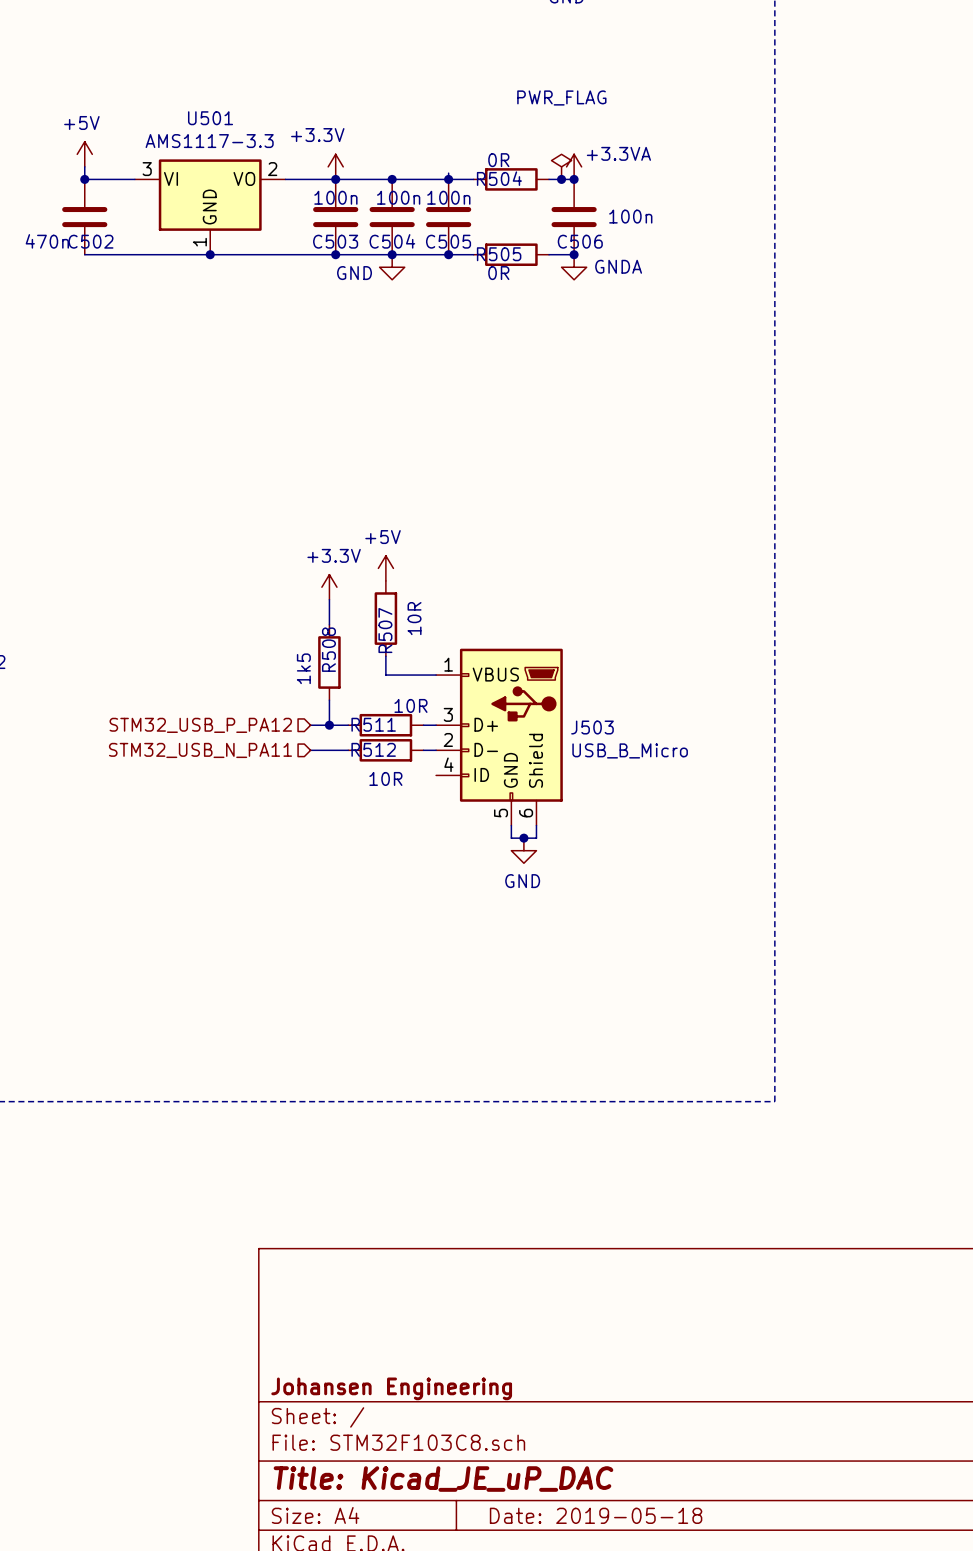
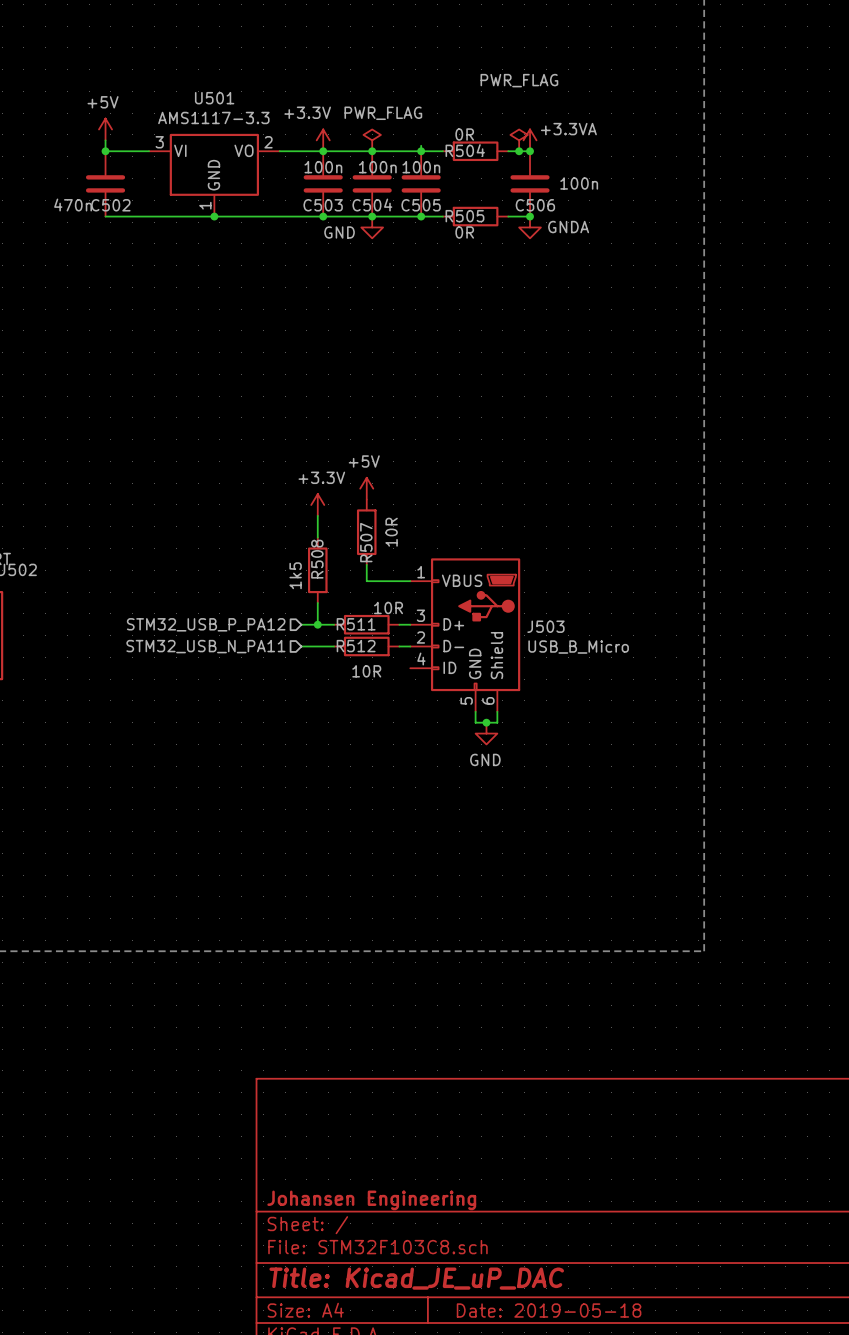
power symbol: none -> PWR_FLAG (372, 140)

